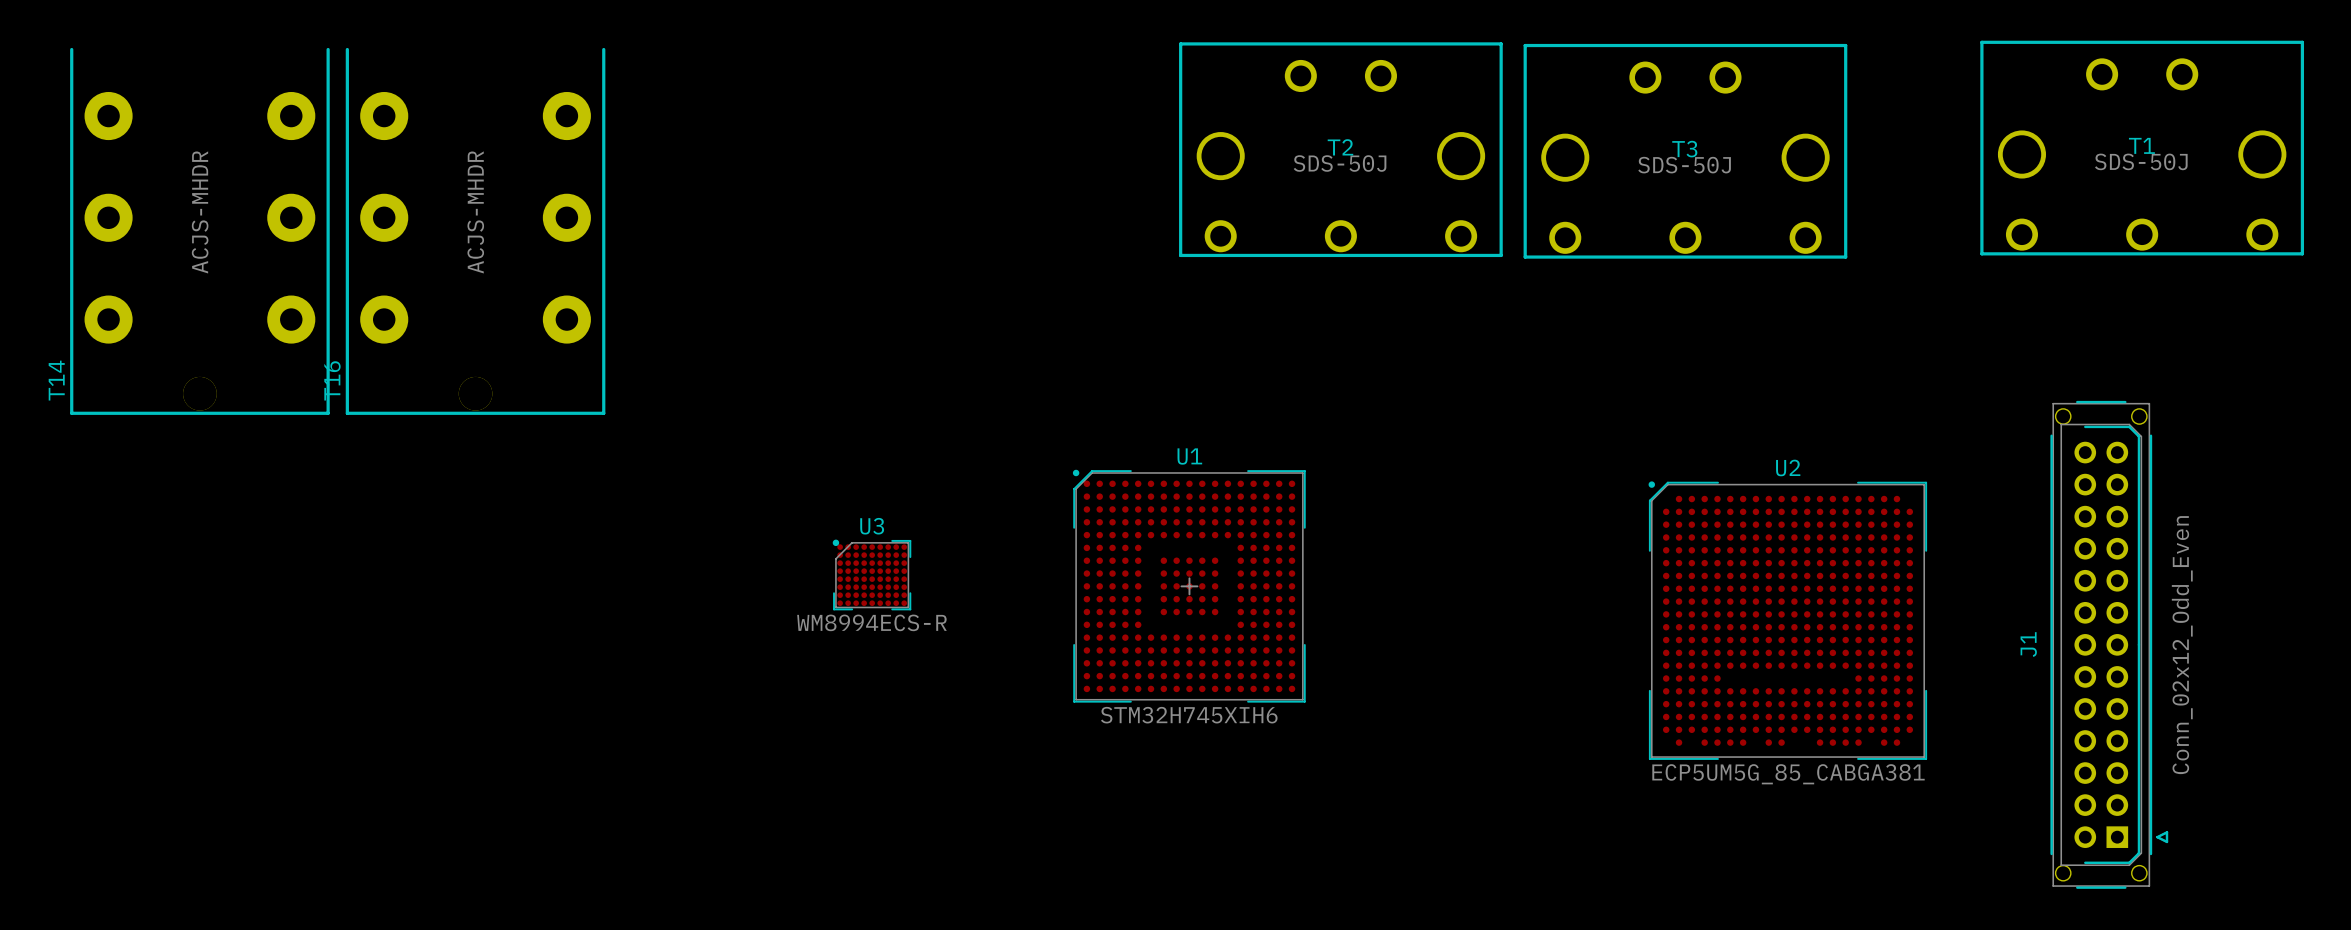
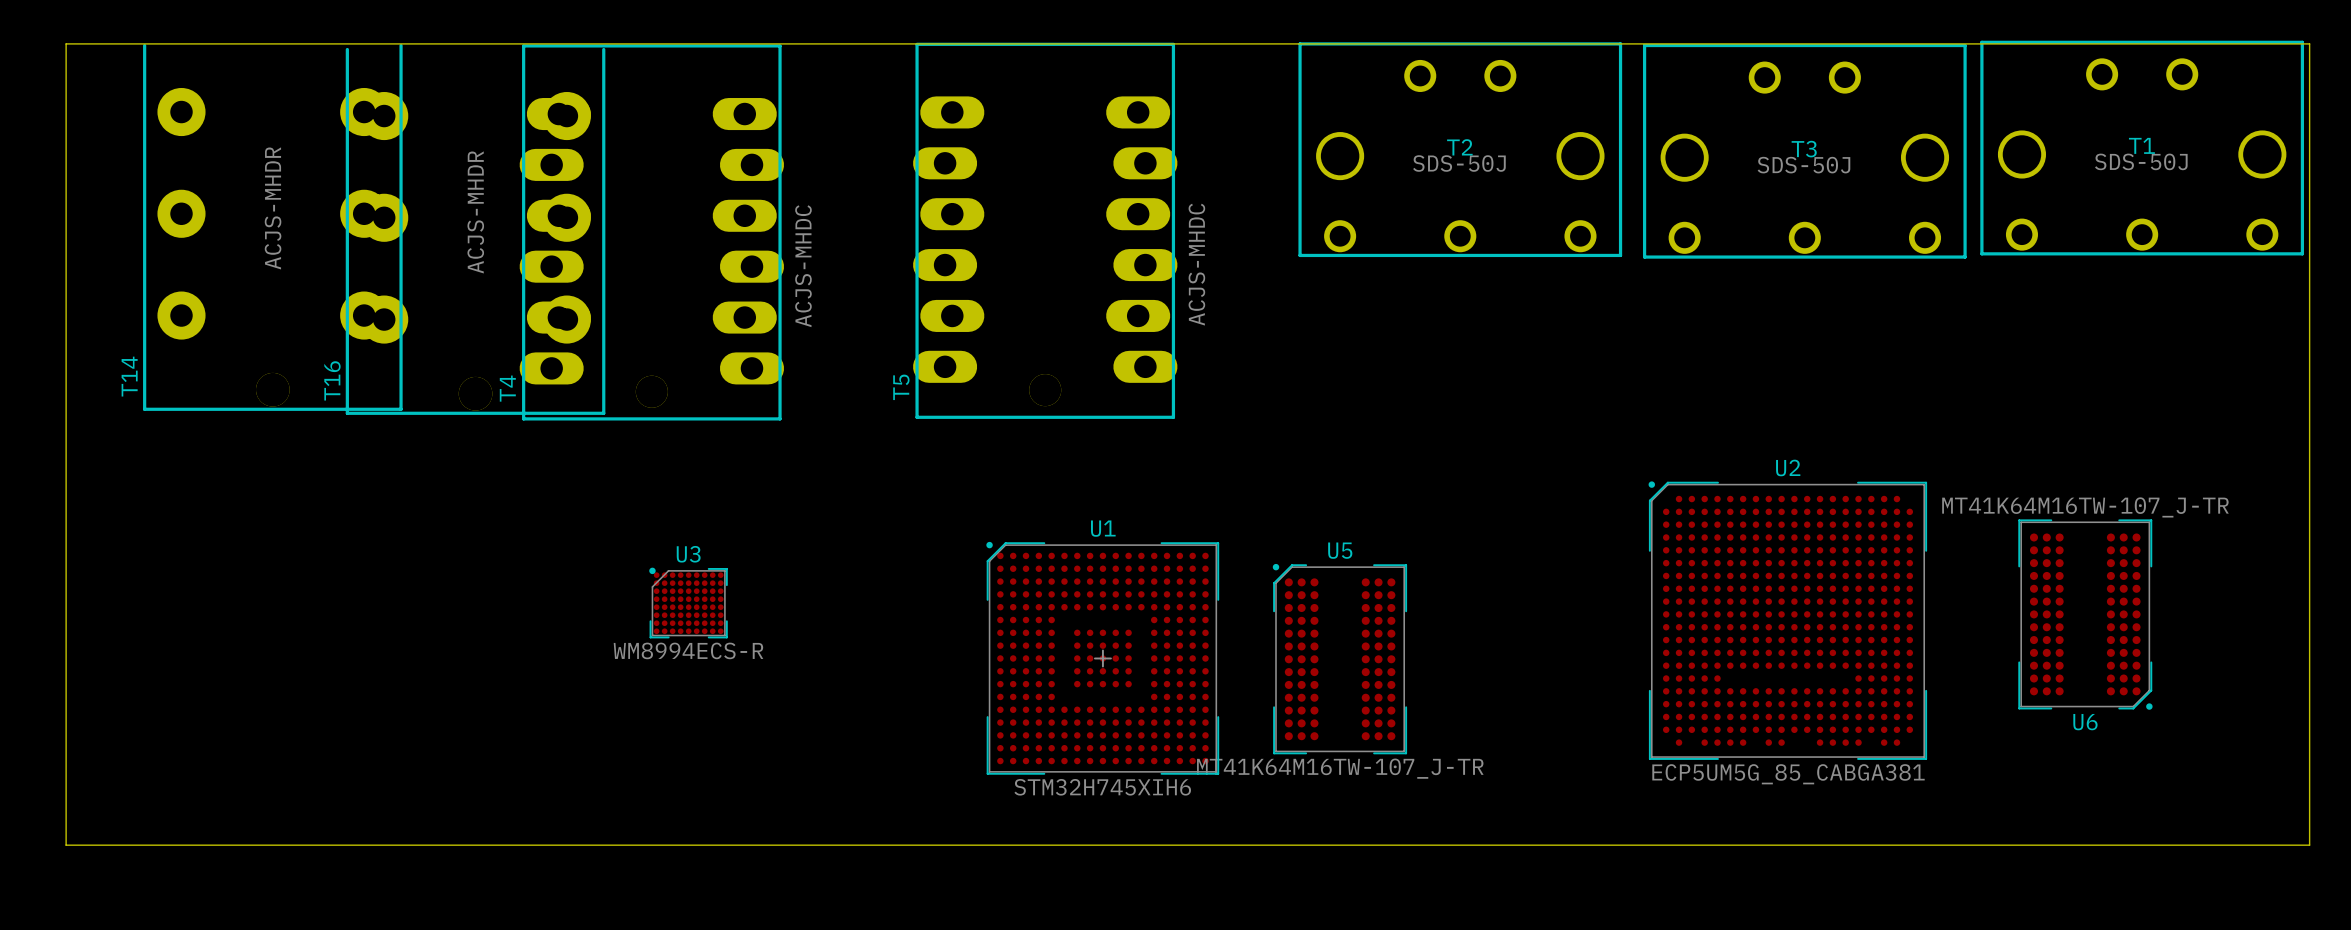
board edge: none -> (66, 43) (66, 845) (2309, 845) (2309, 43) (66, 43)
T2 position: (1340, 149) -> (1460, 149)
T3 position: (1685, 151) -> (1804, 151)
T5: none -> ACJS-MHDC (1045, 230)
T14 position: (199, 231) -> (272, 227)
T4: none -> ACJS-MHDC (651, 232)
U3 position: (872, 574) -> (688, 603)
U1 position: (1189, 586) -> (1102, 658)
U6: none -> MT41K64M16TW-107_J-TR (2085, 614)
J1: Conn_02x12_Odd_Even (2109, 644) -> none
U5: none -> MT41K64M16TW-107_J-TR (1339, 659)

